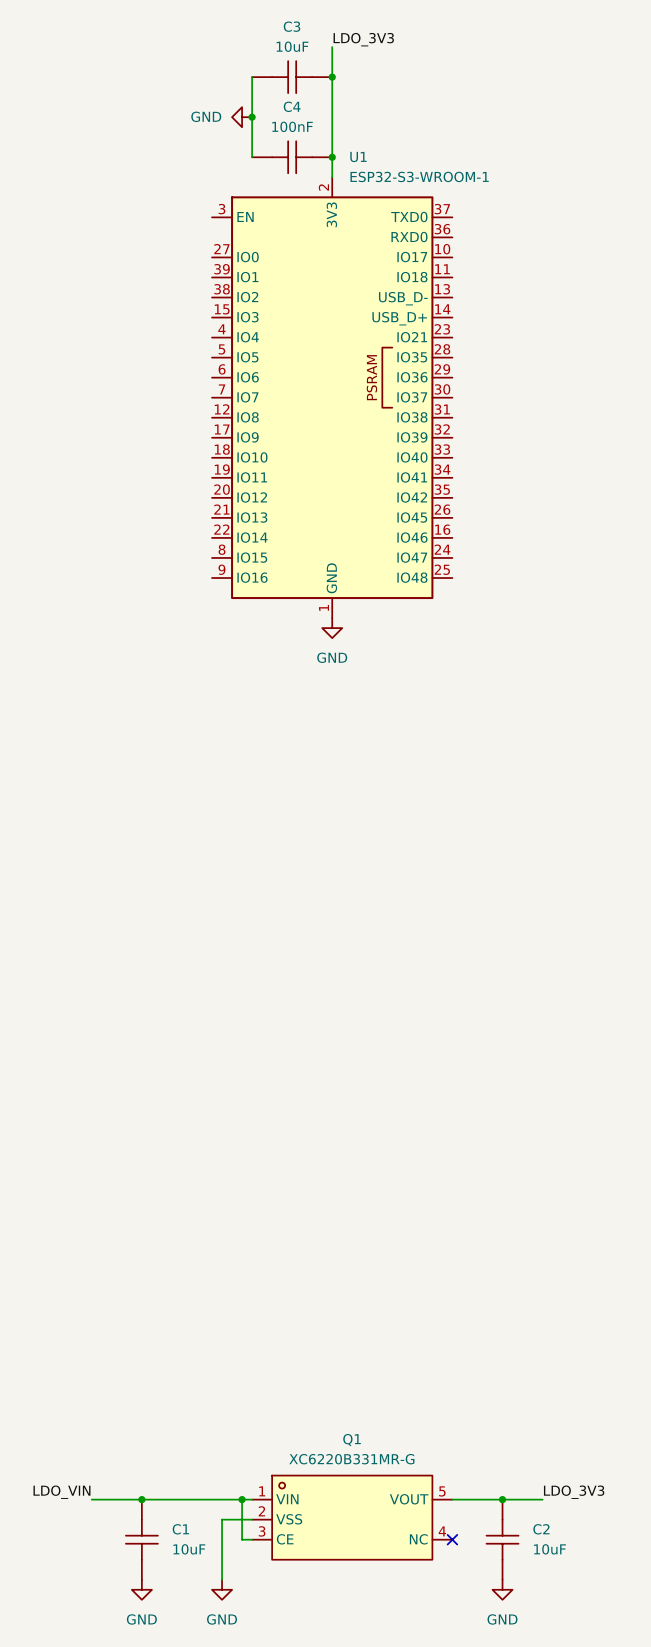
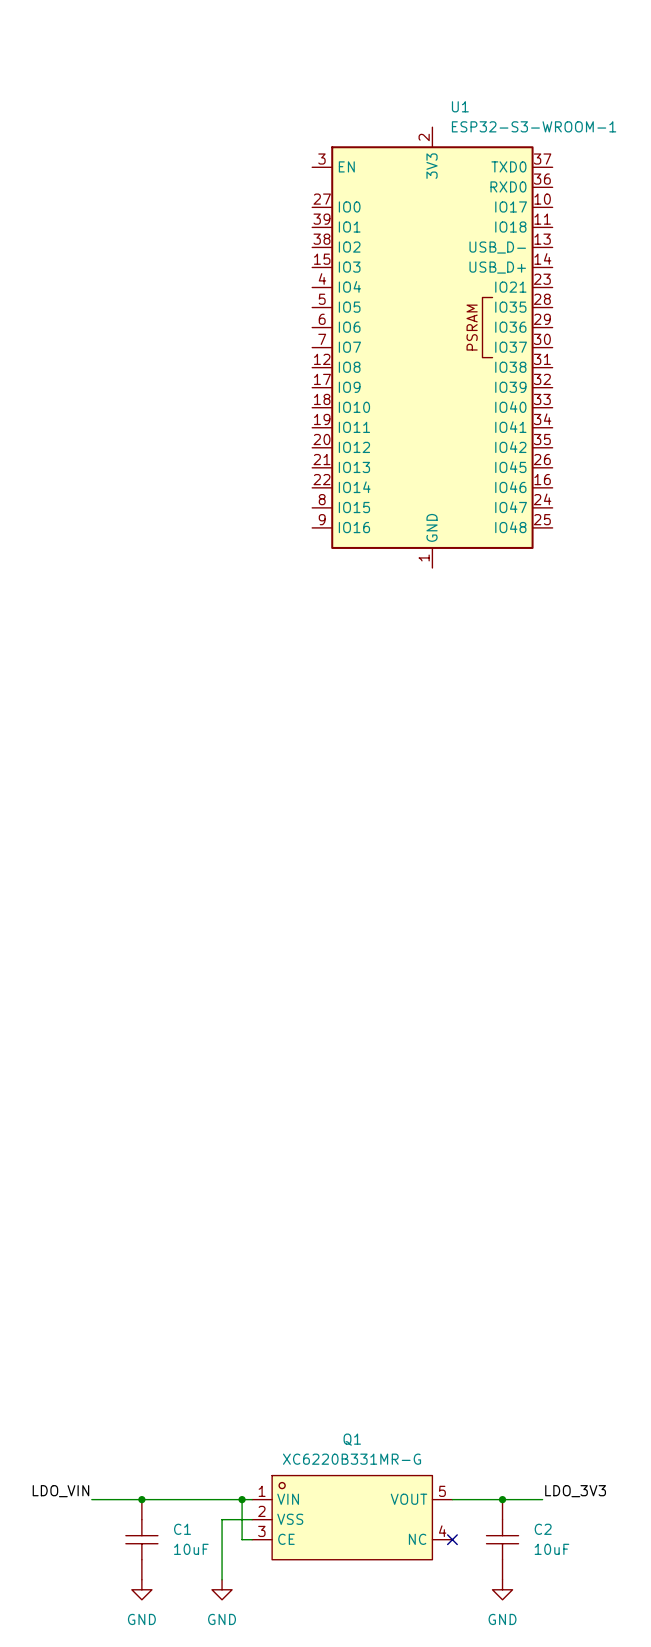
label: LDO_3V3 (363, 39) -> none
wire: (332, 47) (332, 177) -> none
wire: (252, 77) (252, 157) -> none
C3: 10uF (292, 77) -> none
junction: (332, 77) -> none
power symbol: GND (242, 117) -> none
junction: (252, 117) -> none
C4: 100nF (292, 157) -> none
junction: (332, 157) -> none
U1 position: (332, 397) -> (432, 347)
power symbol: GND (332, 628) -> none

